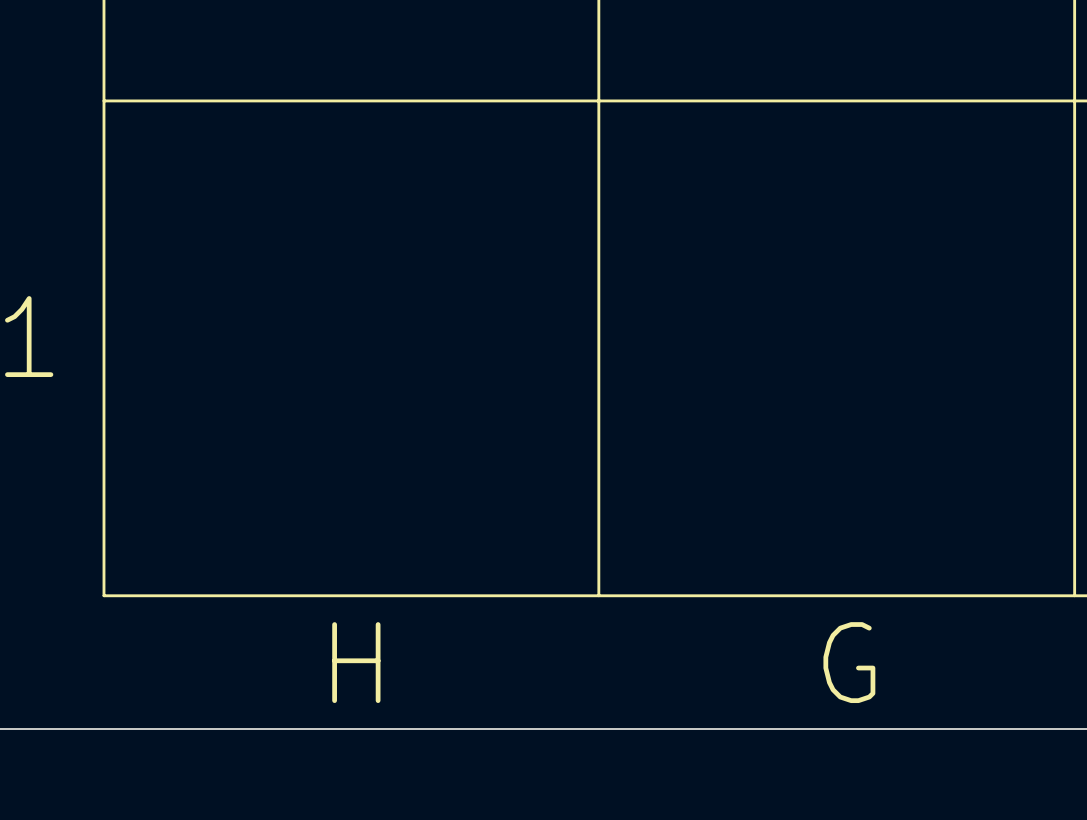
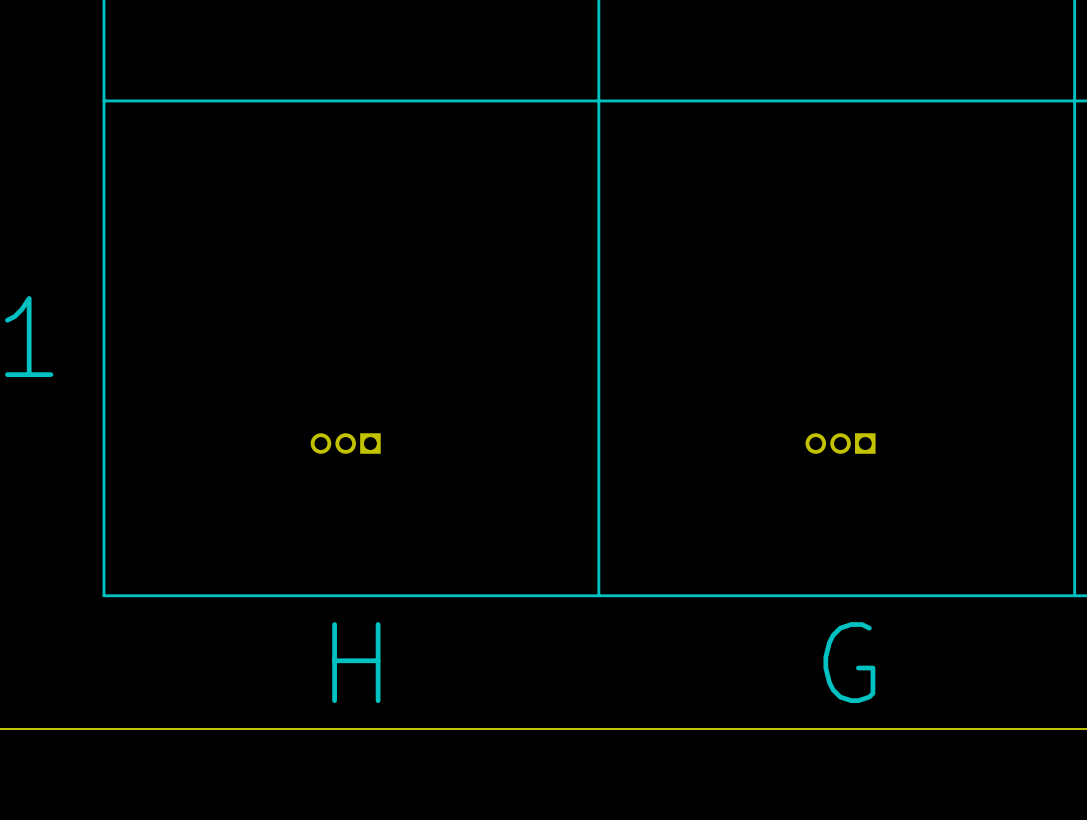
part: none -> (345, 443)
part: none -> (840, 443)

